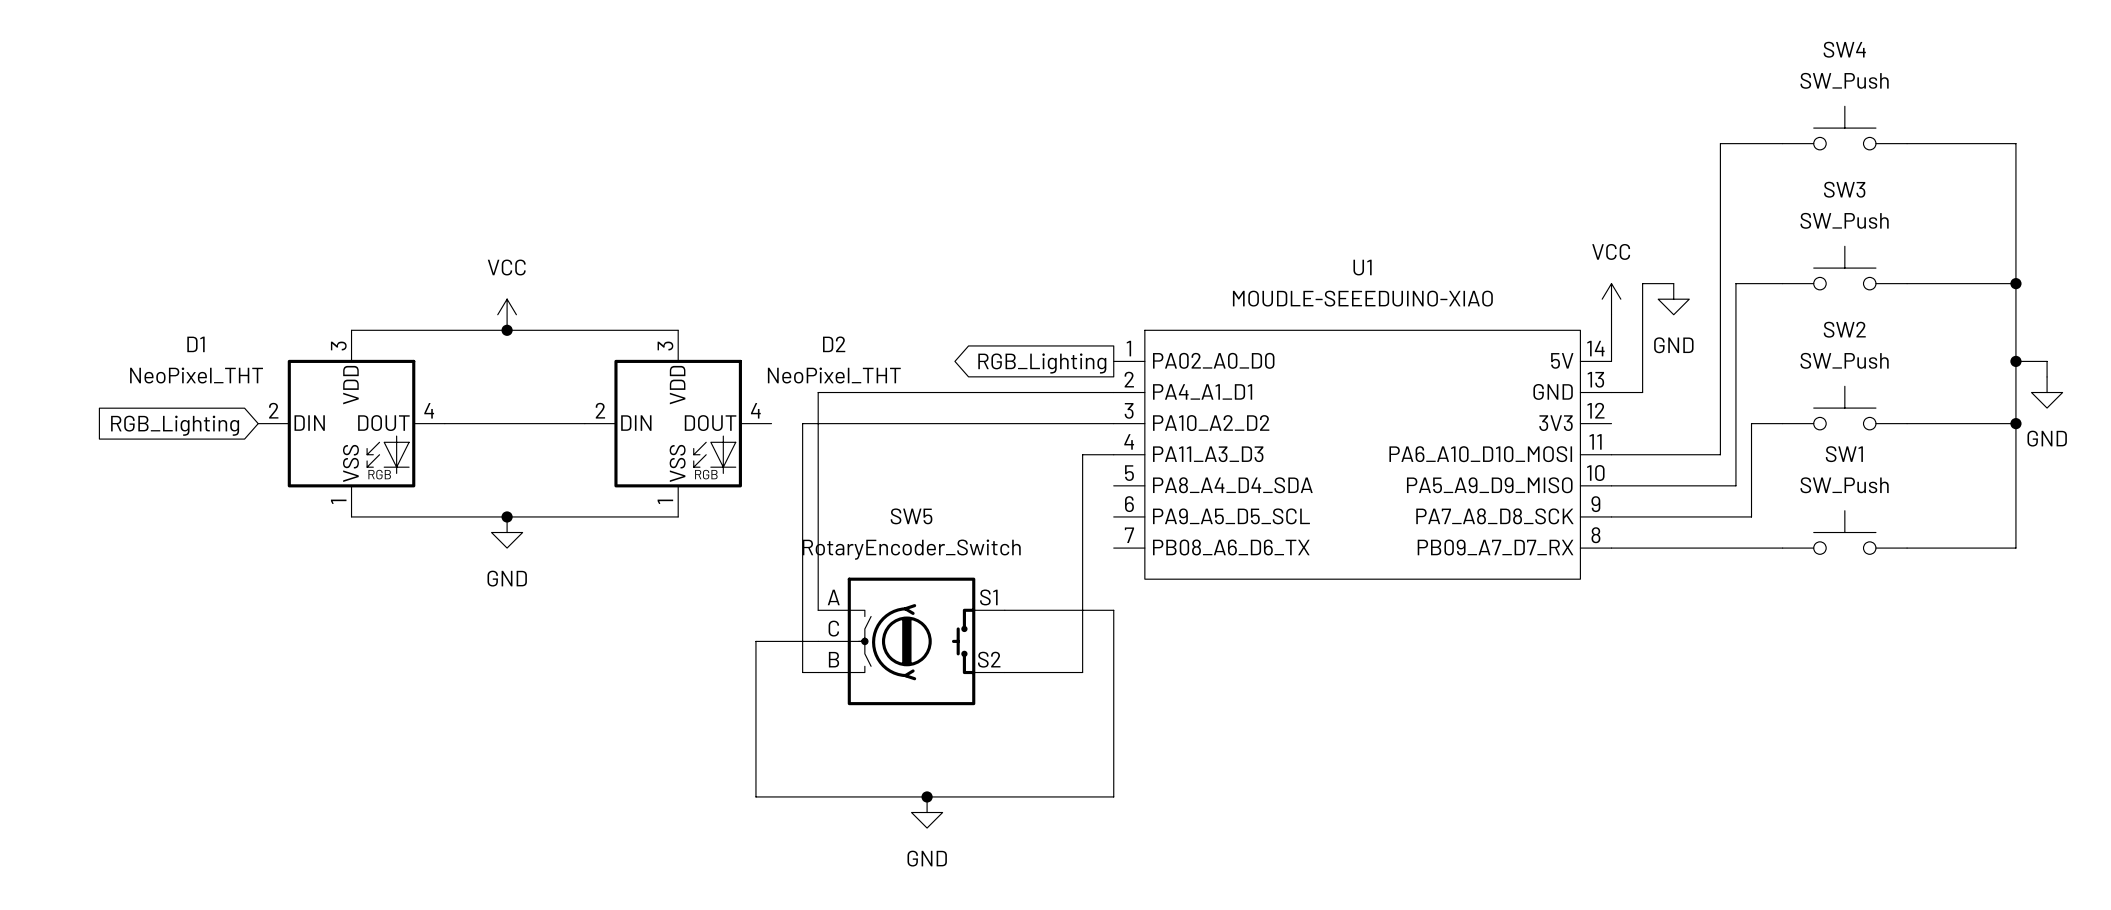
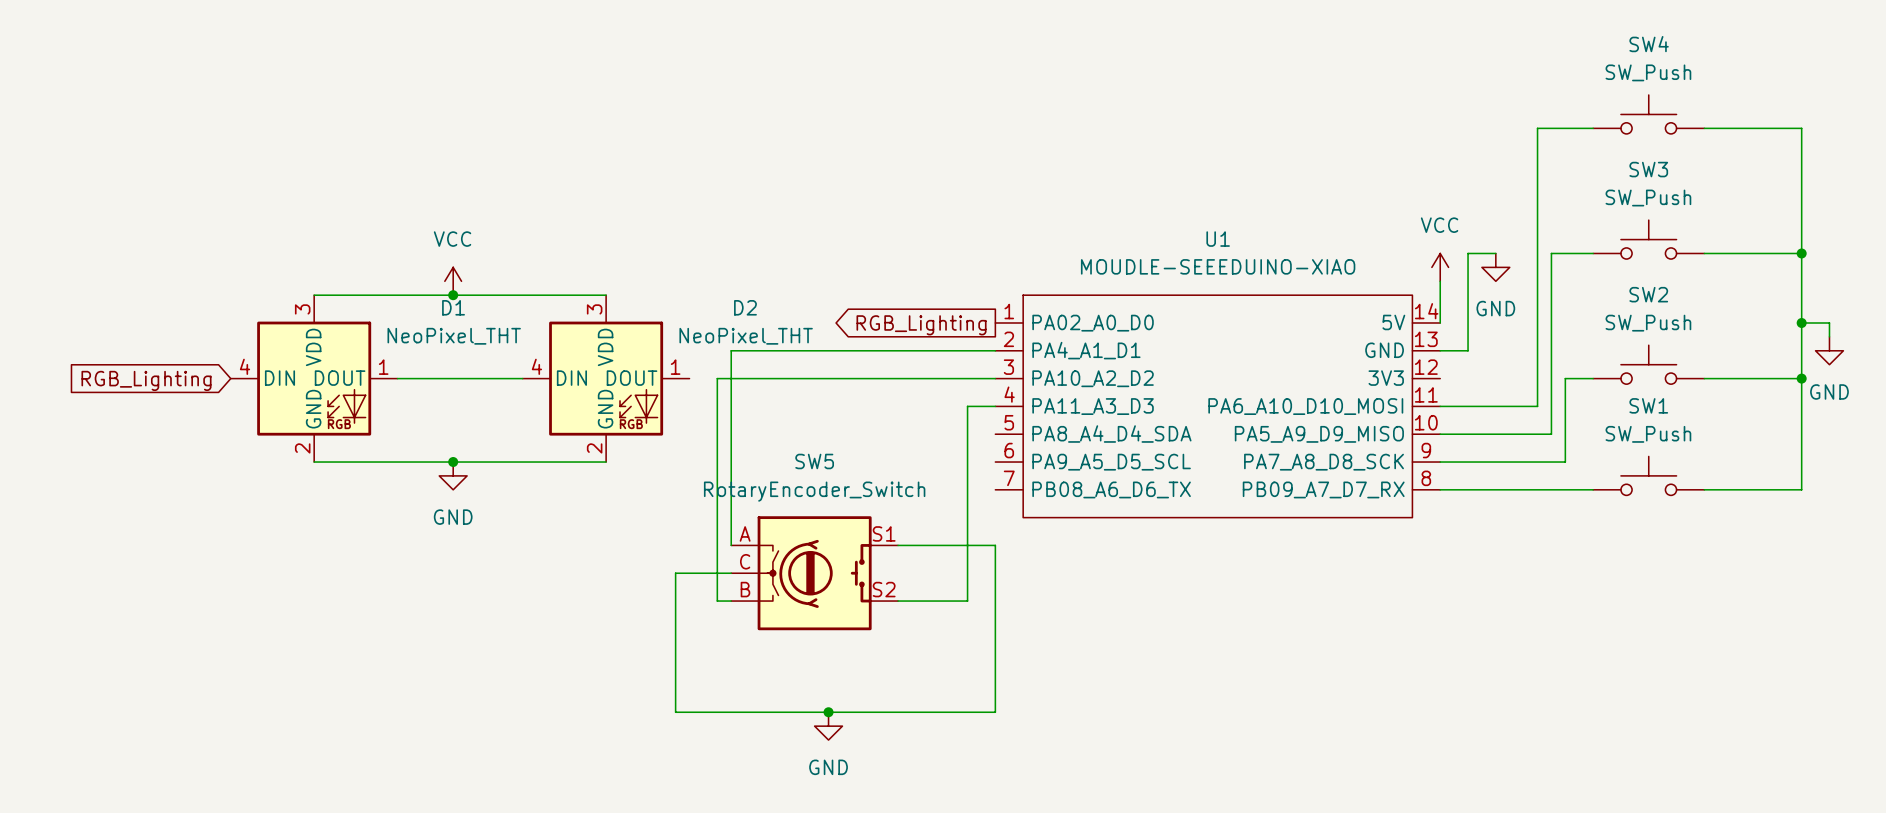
D1 name position: D1 (195, 344) -> D1 (453, 307)
D1 value position: NeoPixel_THT (196, 375) -> NeoPixel_THT (454, 336)
D1 pin number: 2 (273, 410) -> 4 (244, 366)
D1 pin number: 4 (429, 410) -> 1 (383, 367)
D2 pin number: 2 (600, 410) -> 4 (536, 366)
D2 pin number: 4 (755, 410) -> 1 (675, 367)
D1 pin name: VSS (350, 463) -> GND (313, 409)
D2 pin name: VSS (677, 463) -> GND (605, 409)
D1 pin number: 1 (338, 501) -> 2 (302, 448)
D2 pin number: 1 (665, 501) -> 2 (594, 448)

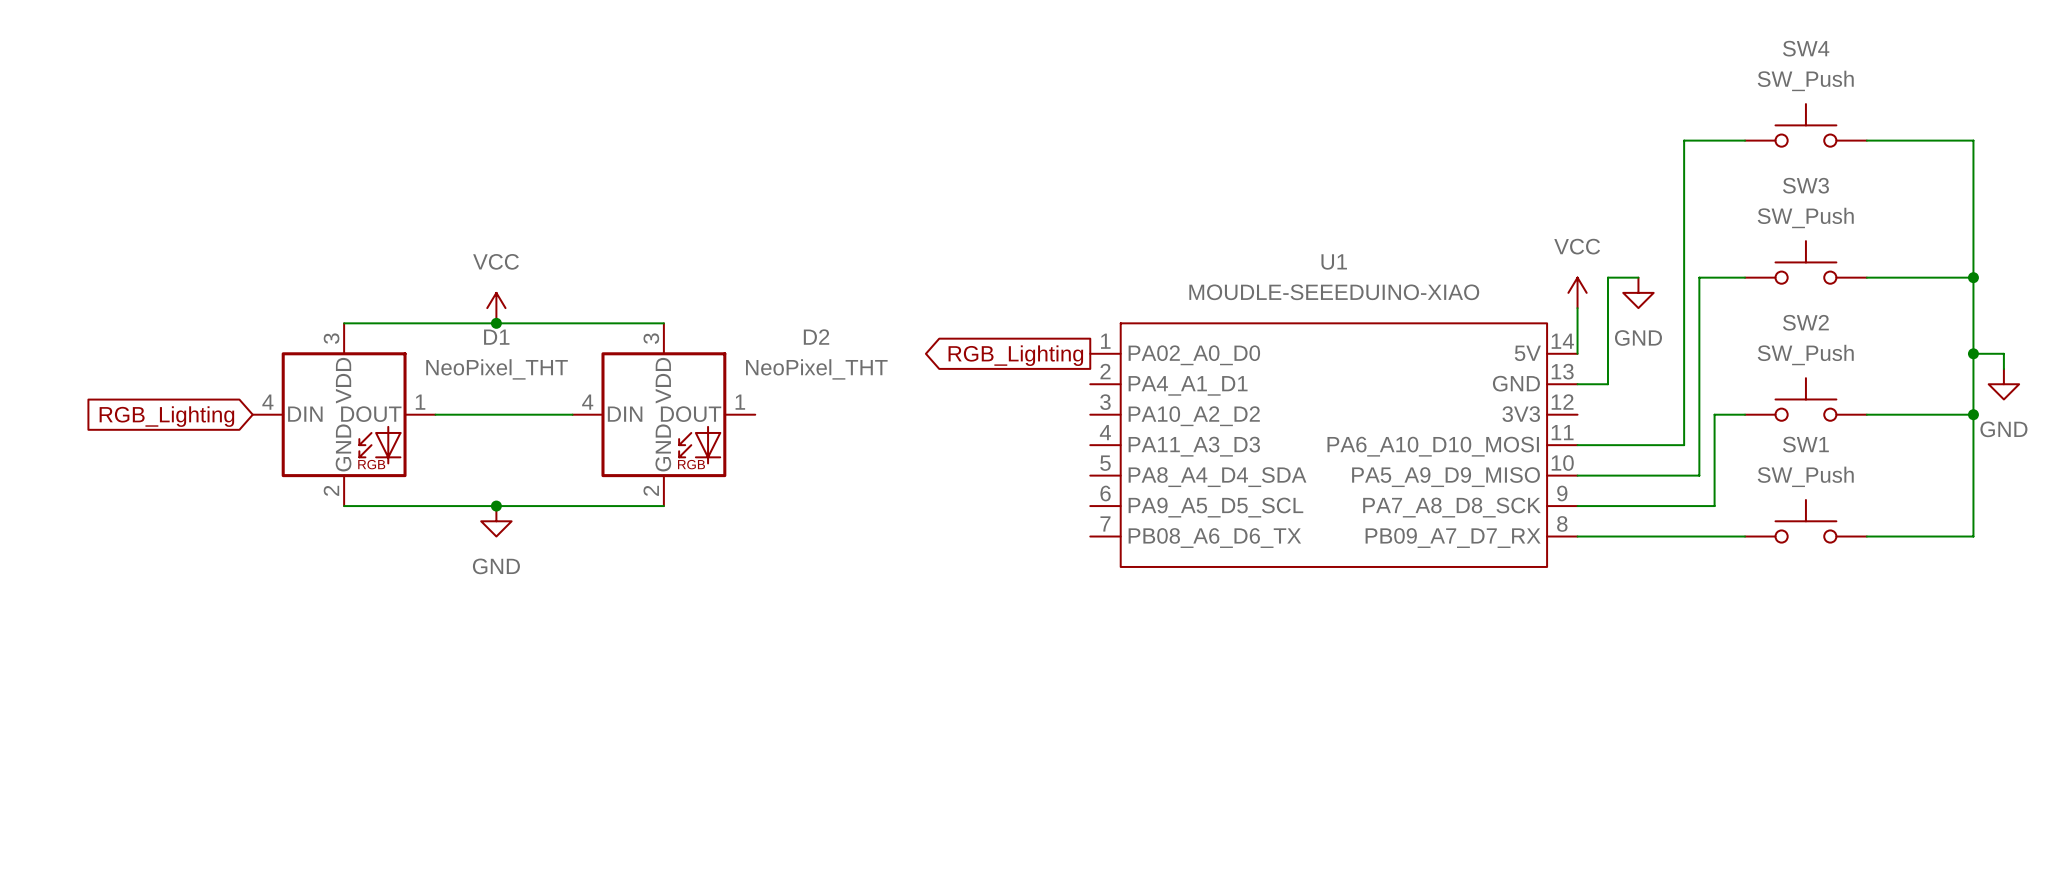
wire: (995, 350) (731, 350) (731, 545) -> none
wire: (995, 378) (717, 378) (717, 601) (731, 601) -> none
wire: (995, 406) (967, 406) (967, 601) (898, 601) -> none
wire: (898, 545) (995, 545) (995, 712) (675, 712) (675, 573) (731, 573) -> none
SW5: RotaryEncoder_Switch (814, 573) -> none
junction: (828, 712) -> none
power symbol: GND (828, 726) -> none

